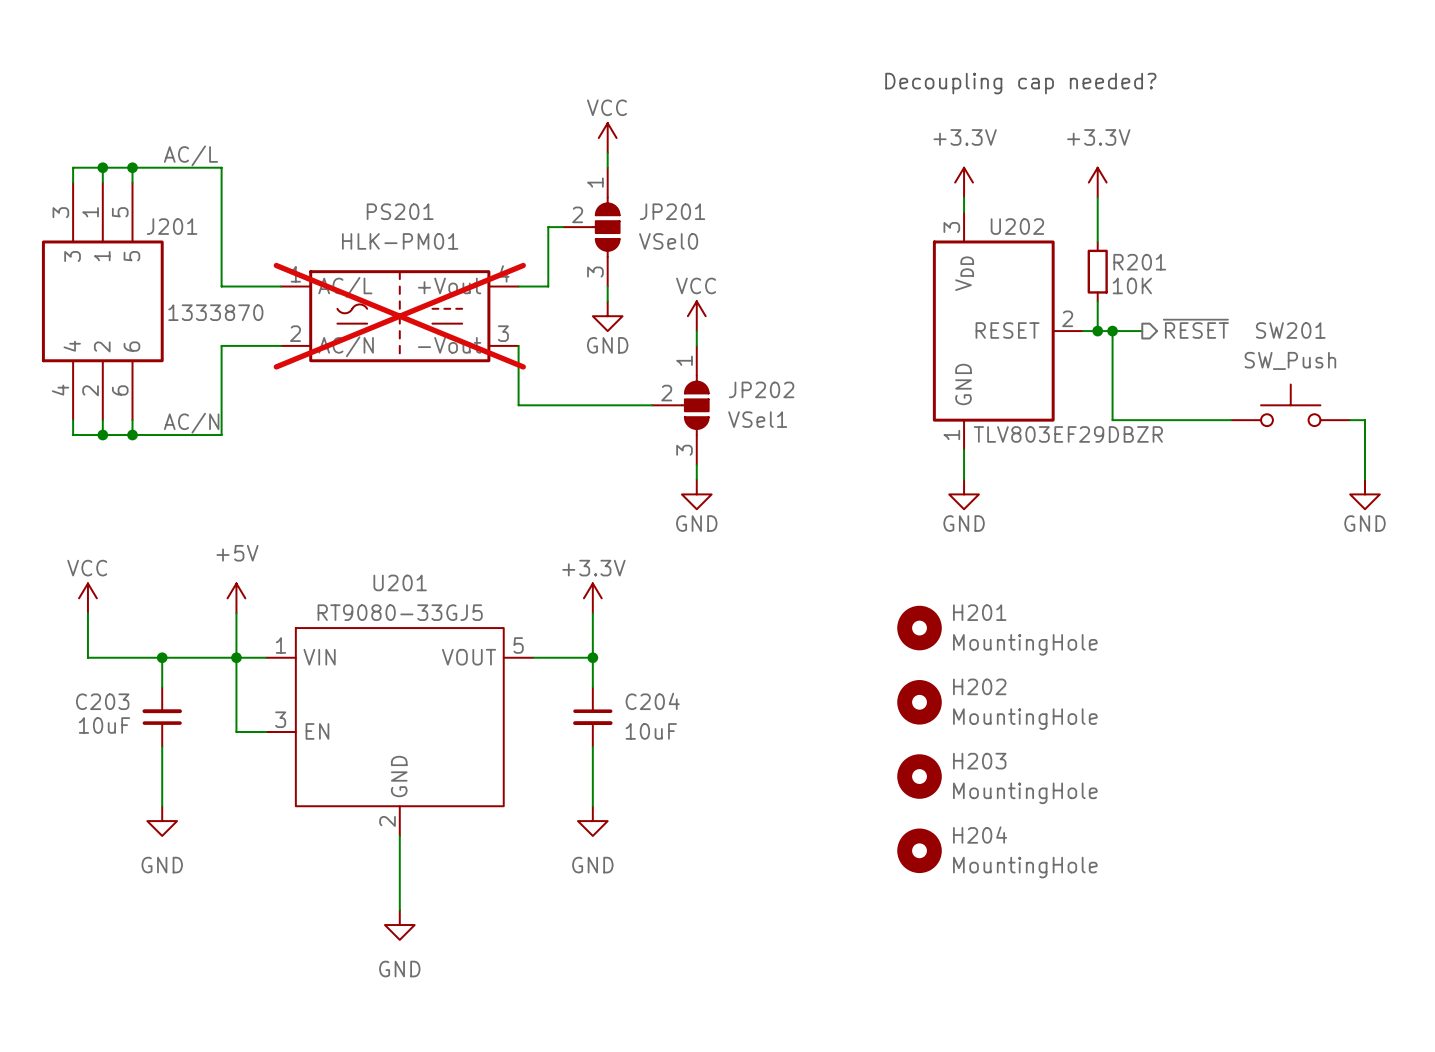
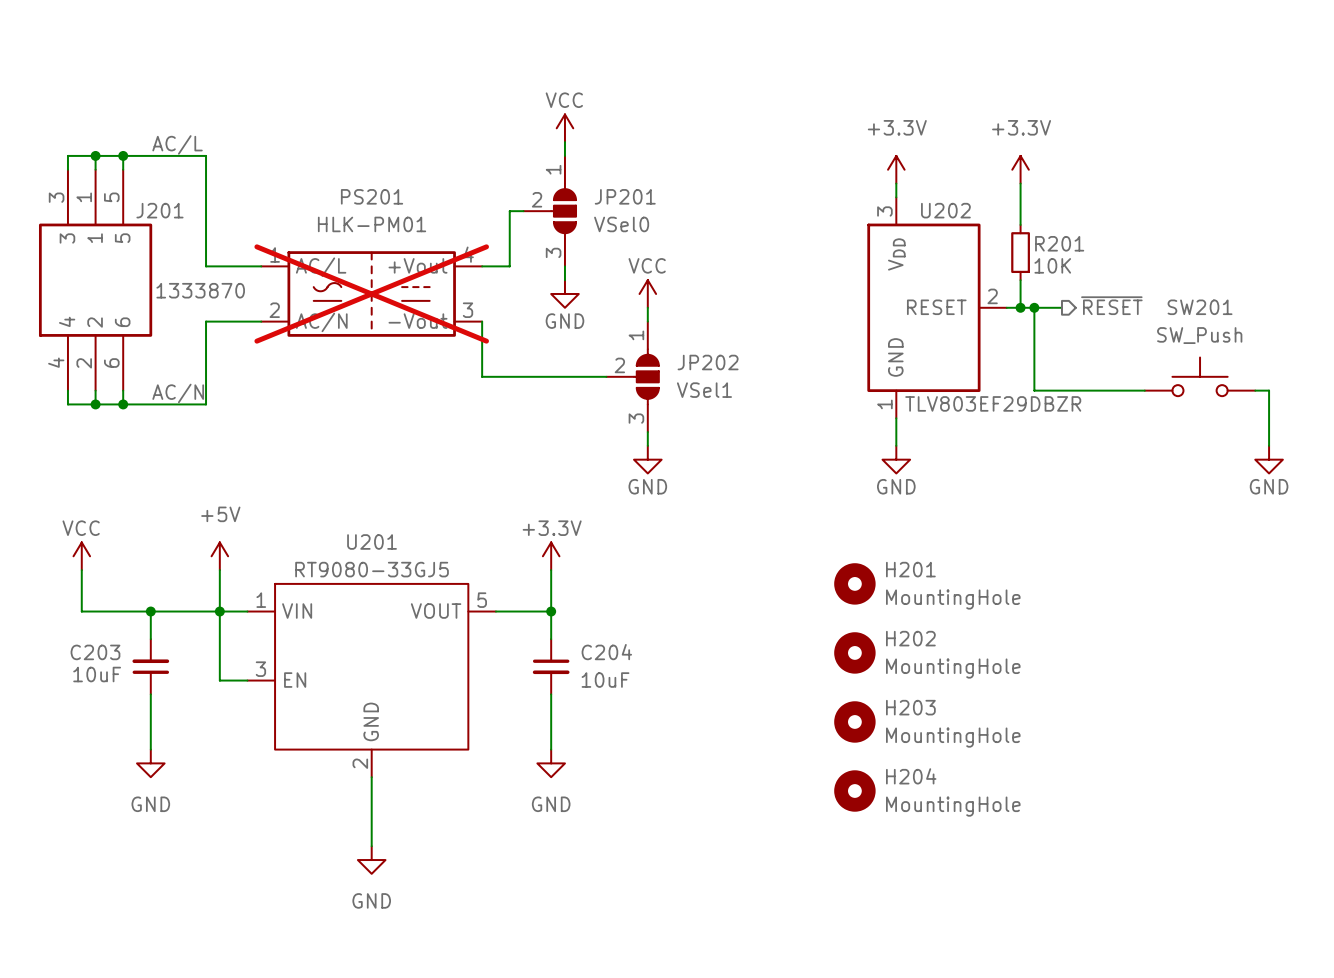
text: Decoupling cap needed? (1020, 83) -> none

